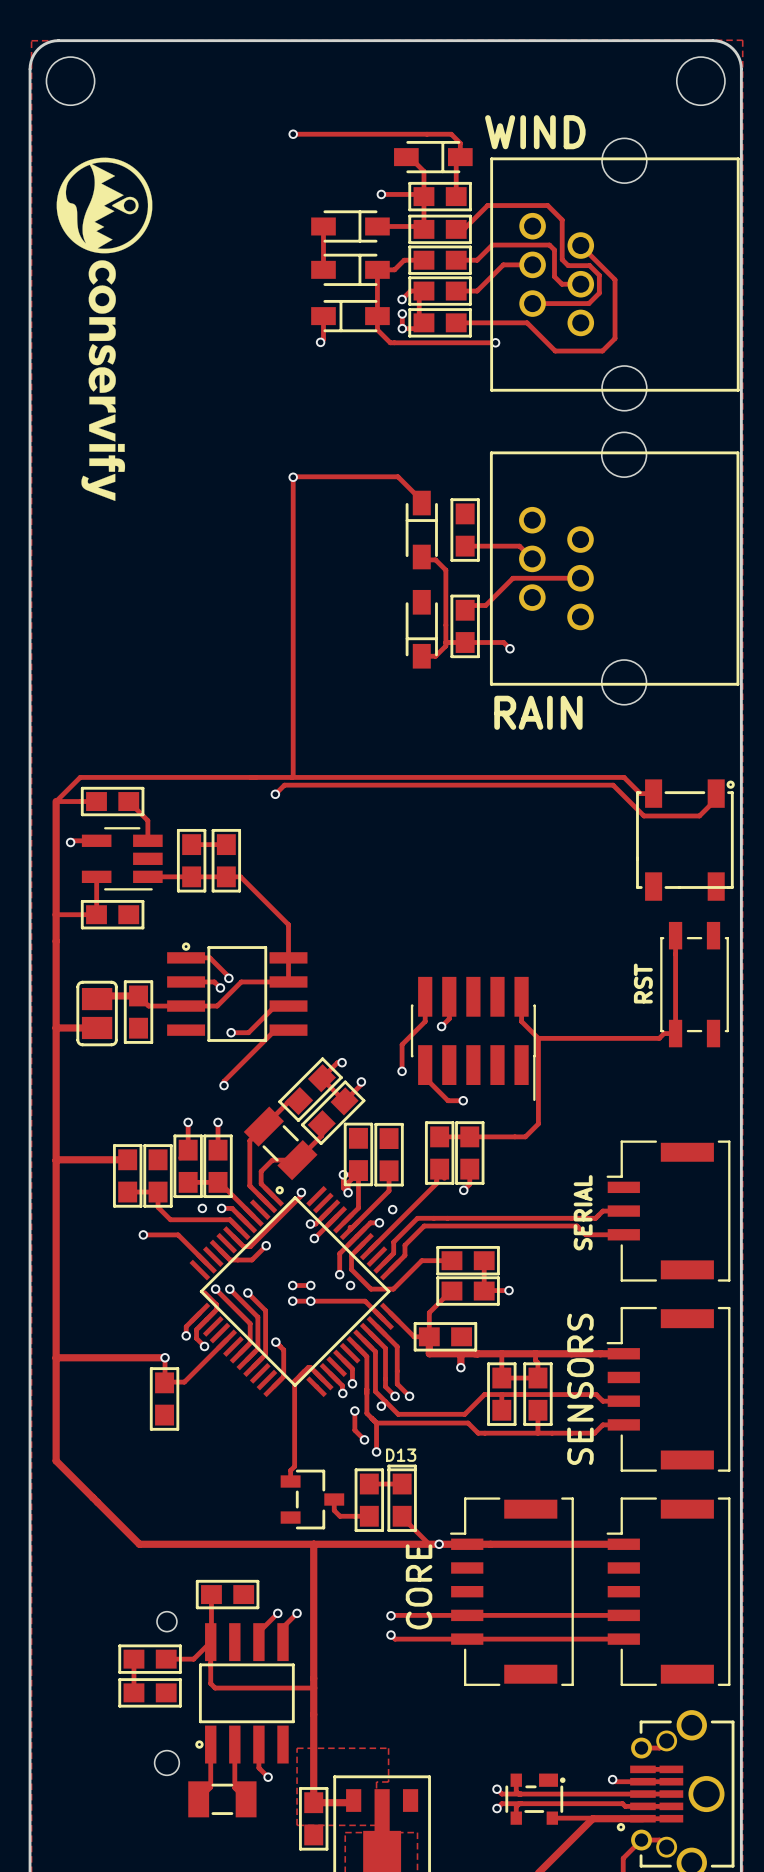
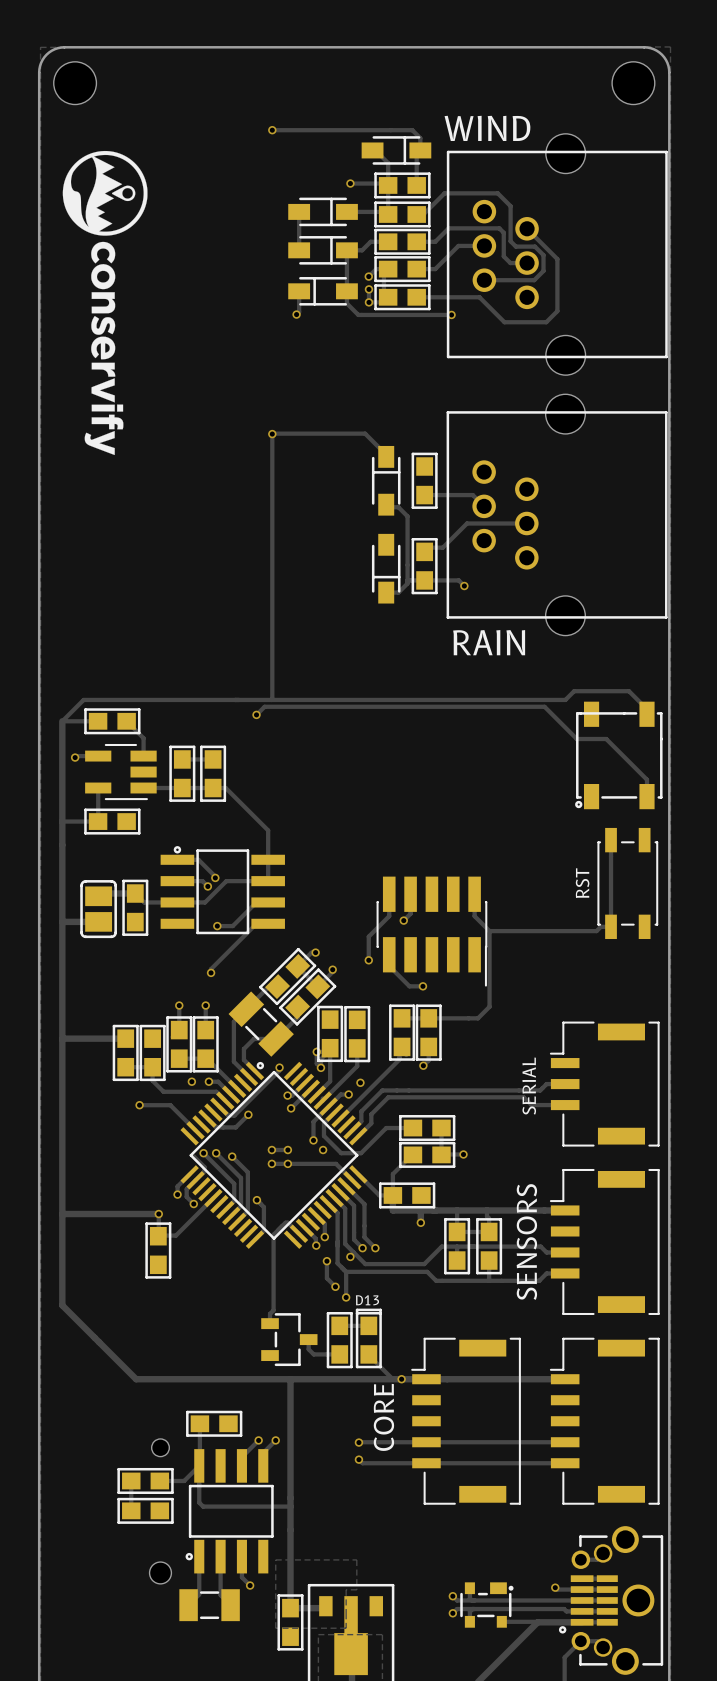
track: (624, 777) (640, 793) (653, 793) -> (565, 699) (574, 691) (628, 691) (647, 709)
track: (600, 785) (613, 785) (643, 815) (699, 815) (716, 799) -> (544, 706) (576, 739) (606, 739) (647, 779) (647, 796)
part rotation: 0° (685, 840) -> 180° (618, 755)

